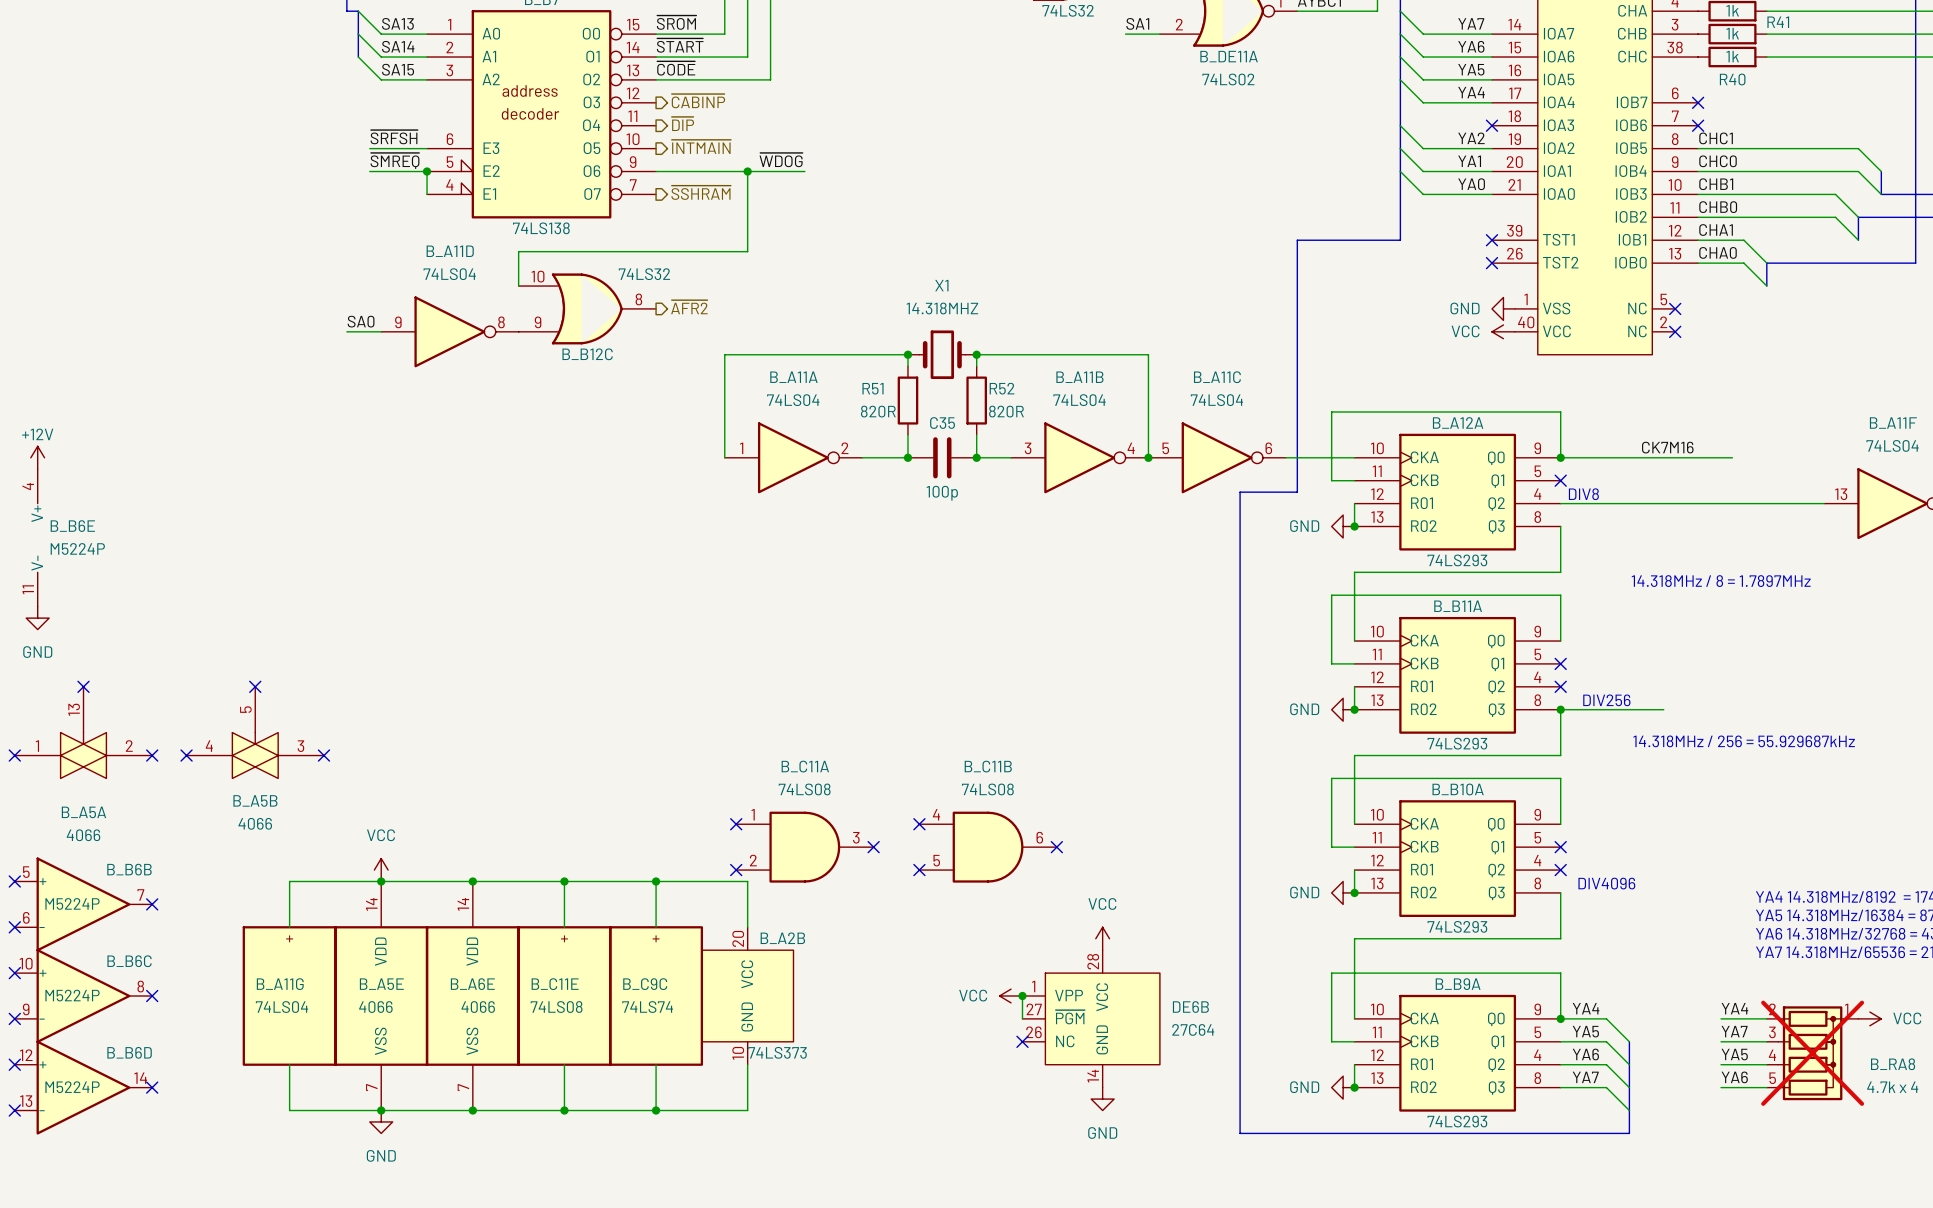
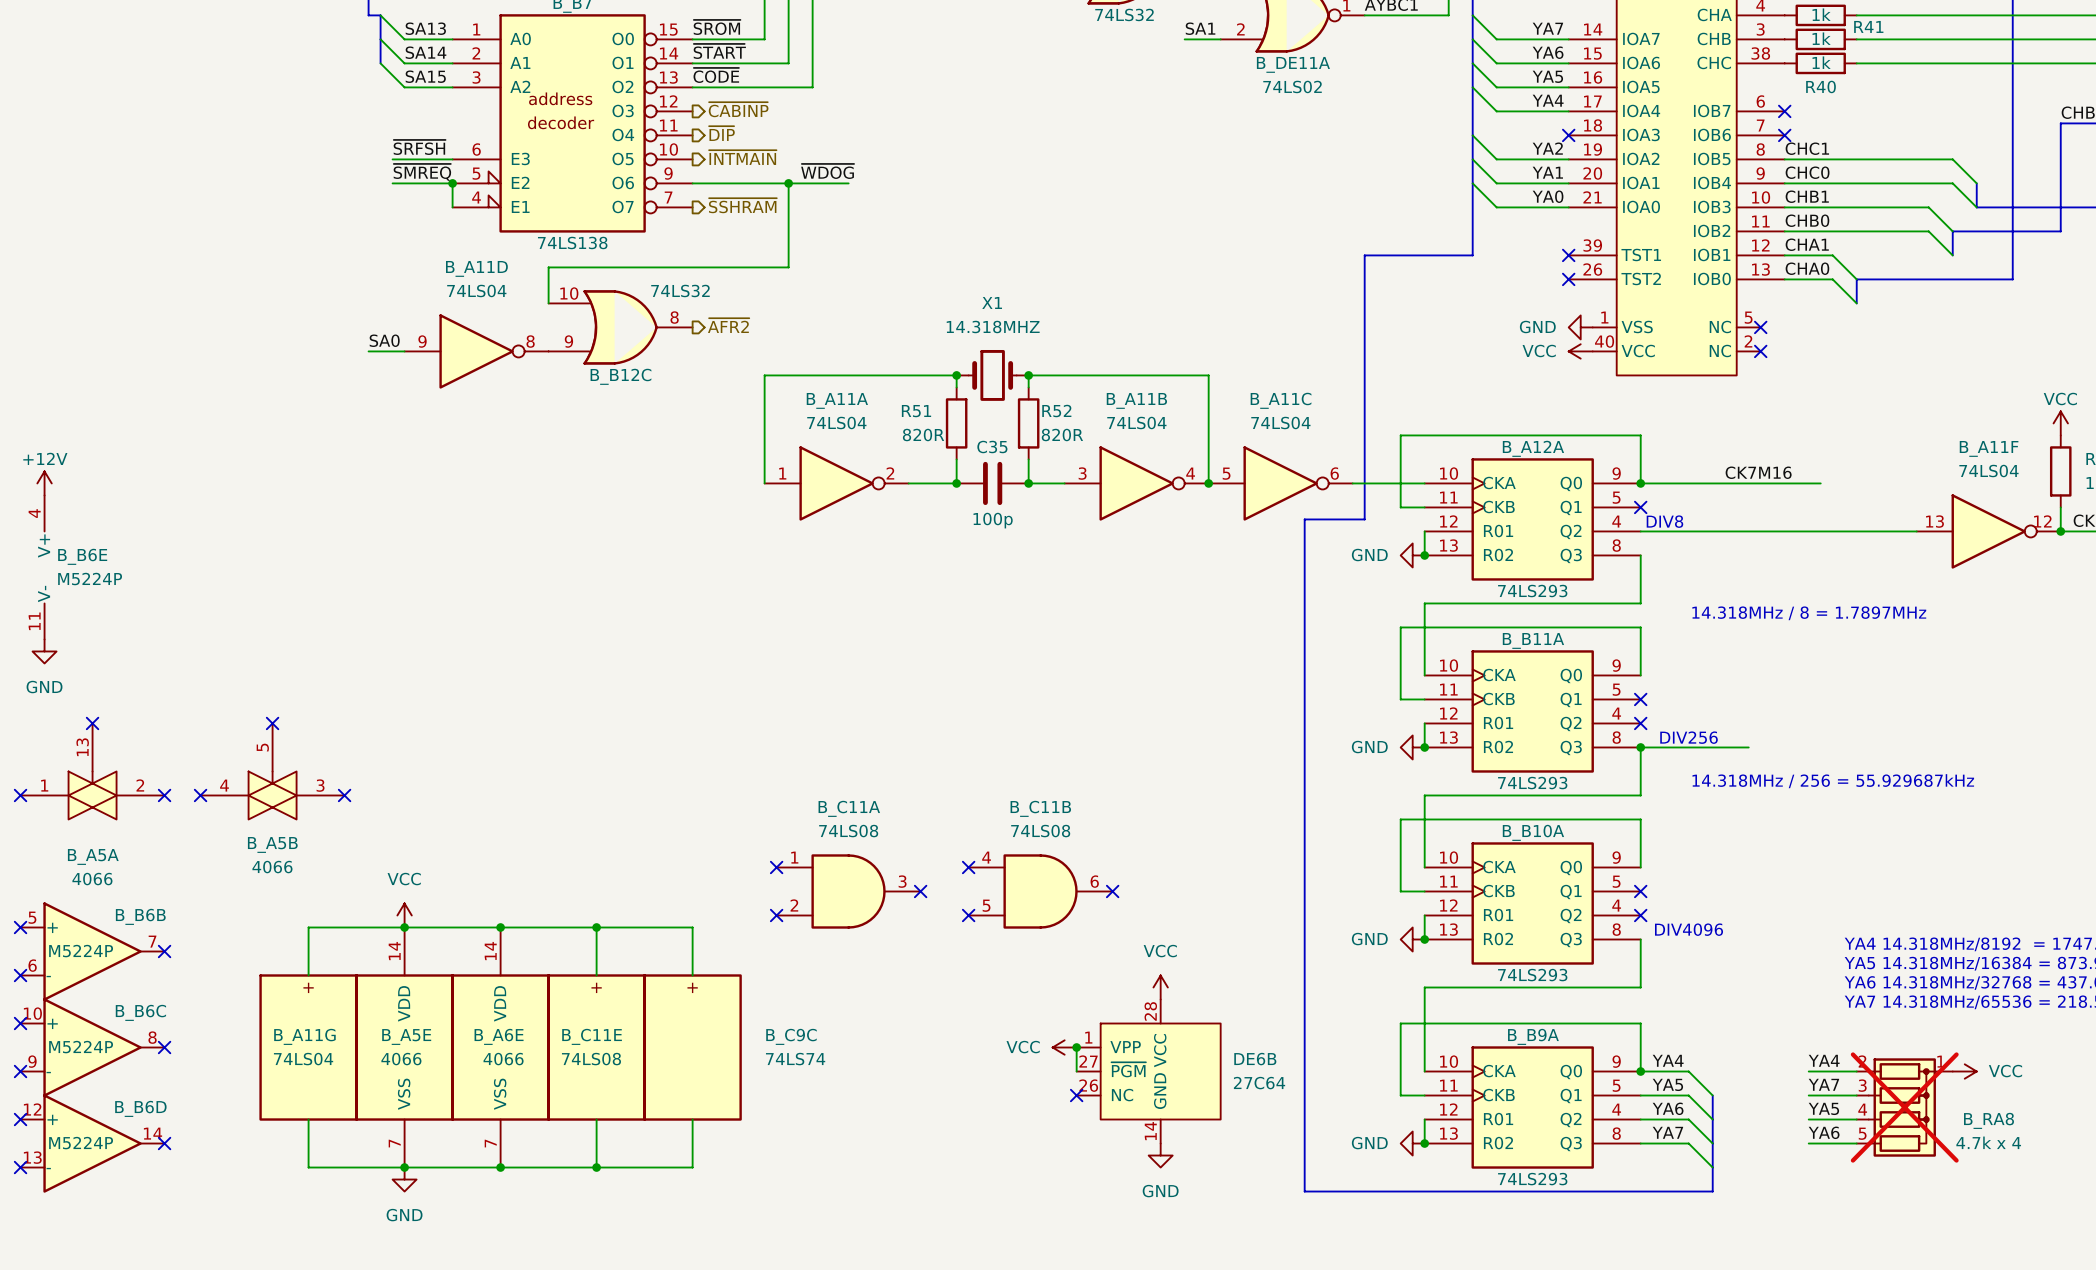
wire: (656, 881) (747, 881) (747, 927) -> none
junction: (656, 881) -> none
B_C9C name position: B_C9C (645, 984) -> B_C9C (791, 1036)
B_A2B: 74LS373 (747, 996) -> none
B_C9C value position: 74LS74 (647, 1007) -> 74LS74 (795, 1059)
wire: (747, 1064) (747, 1110) (656, 1110) -> none
junction: (656, 1110) -> none

